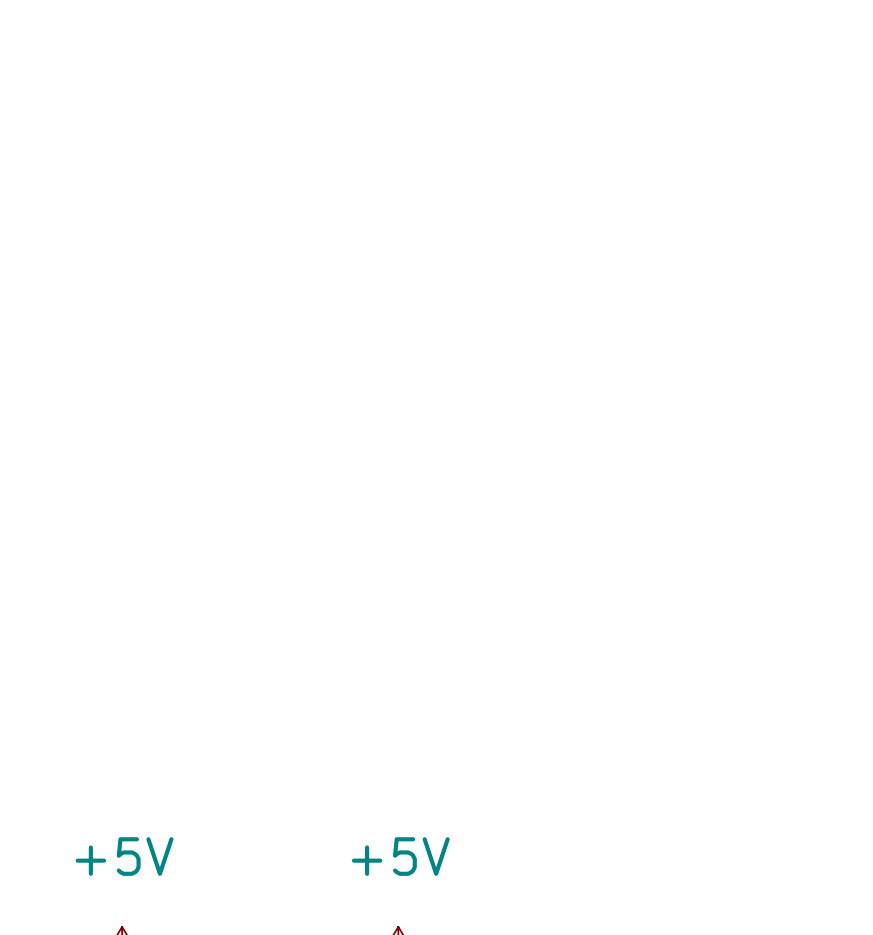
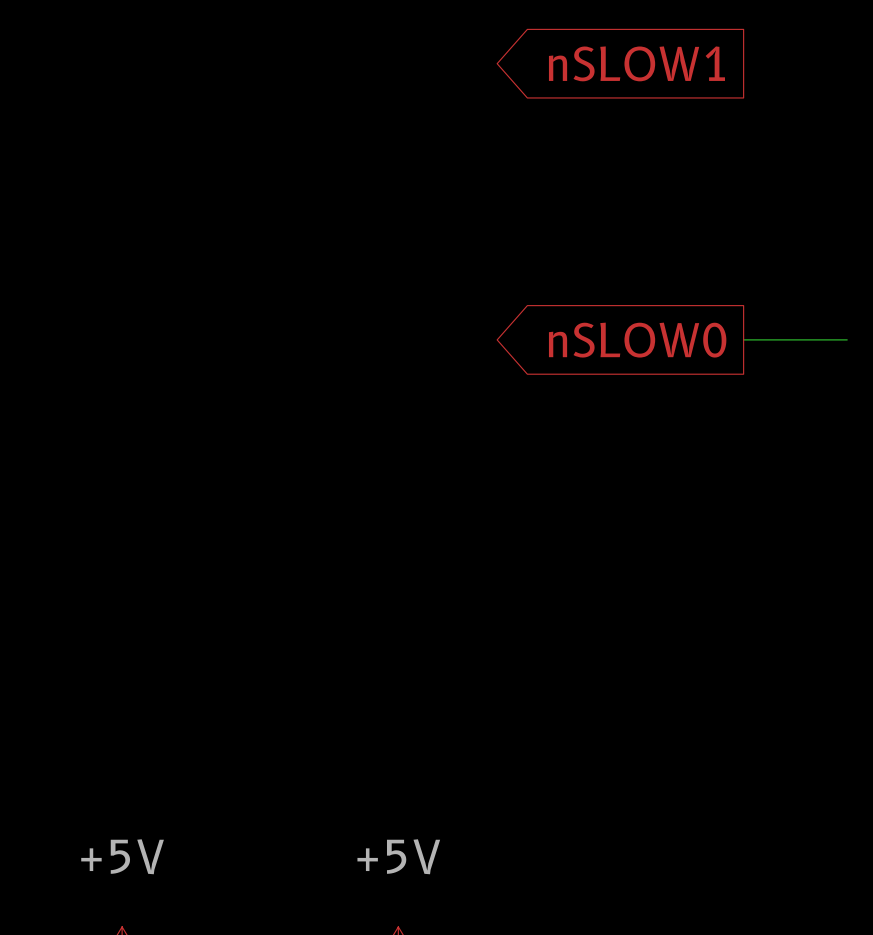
global label: none -> nSLOW1 (636, 63)
global label: none -> nSLOW0 (637, 340)
wire: none -> (743, 339) (847, 339)

